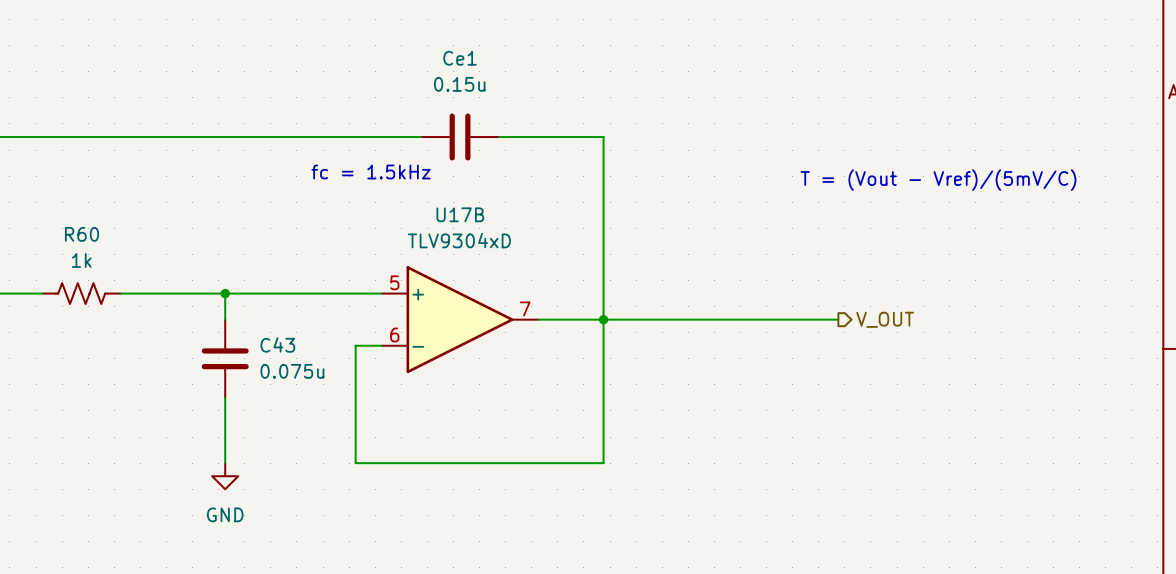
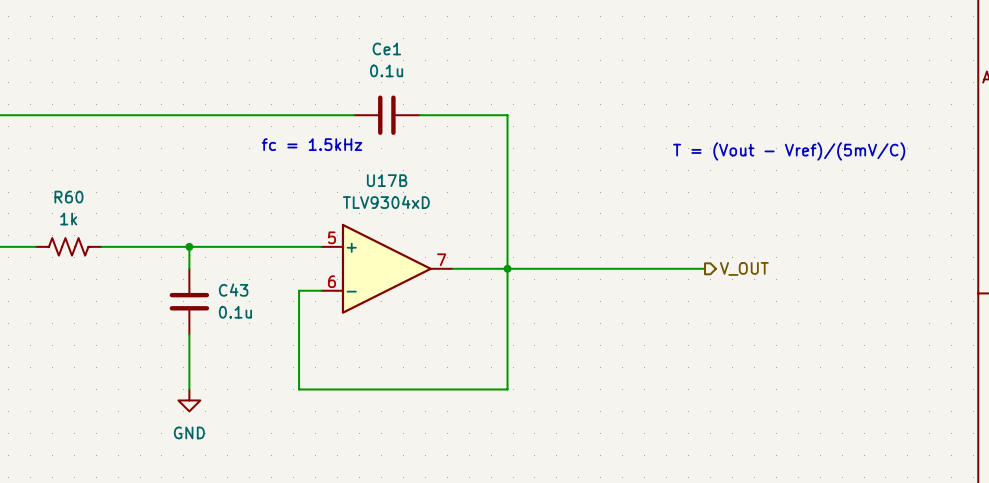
Ce1 value: 0.15u (459, 84) -> 0.1u (386, 70)
C43 value: 0.075u (292, 371) -> 0.1u (235, 312)

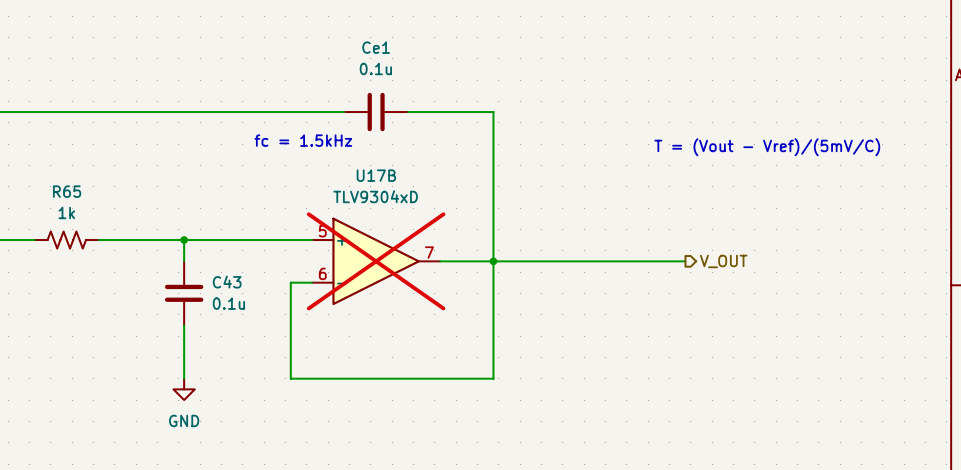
R60 name: R60 (68, 197) -> R65 (67, 191)
U17B do-not-place cross: none -> (376, 261)

